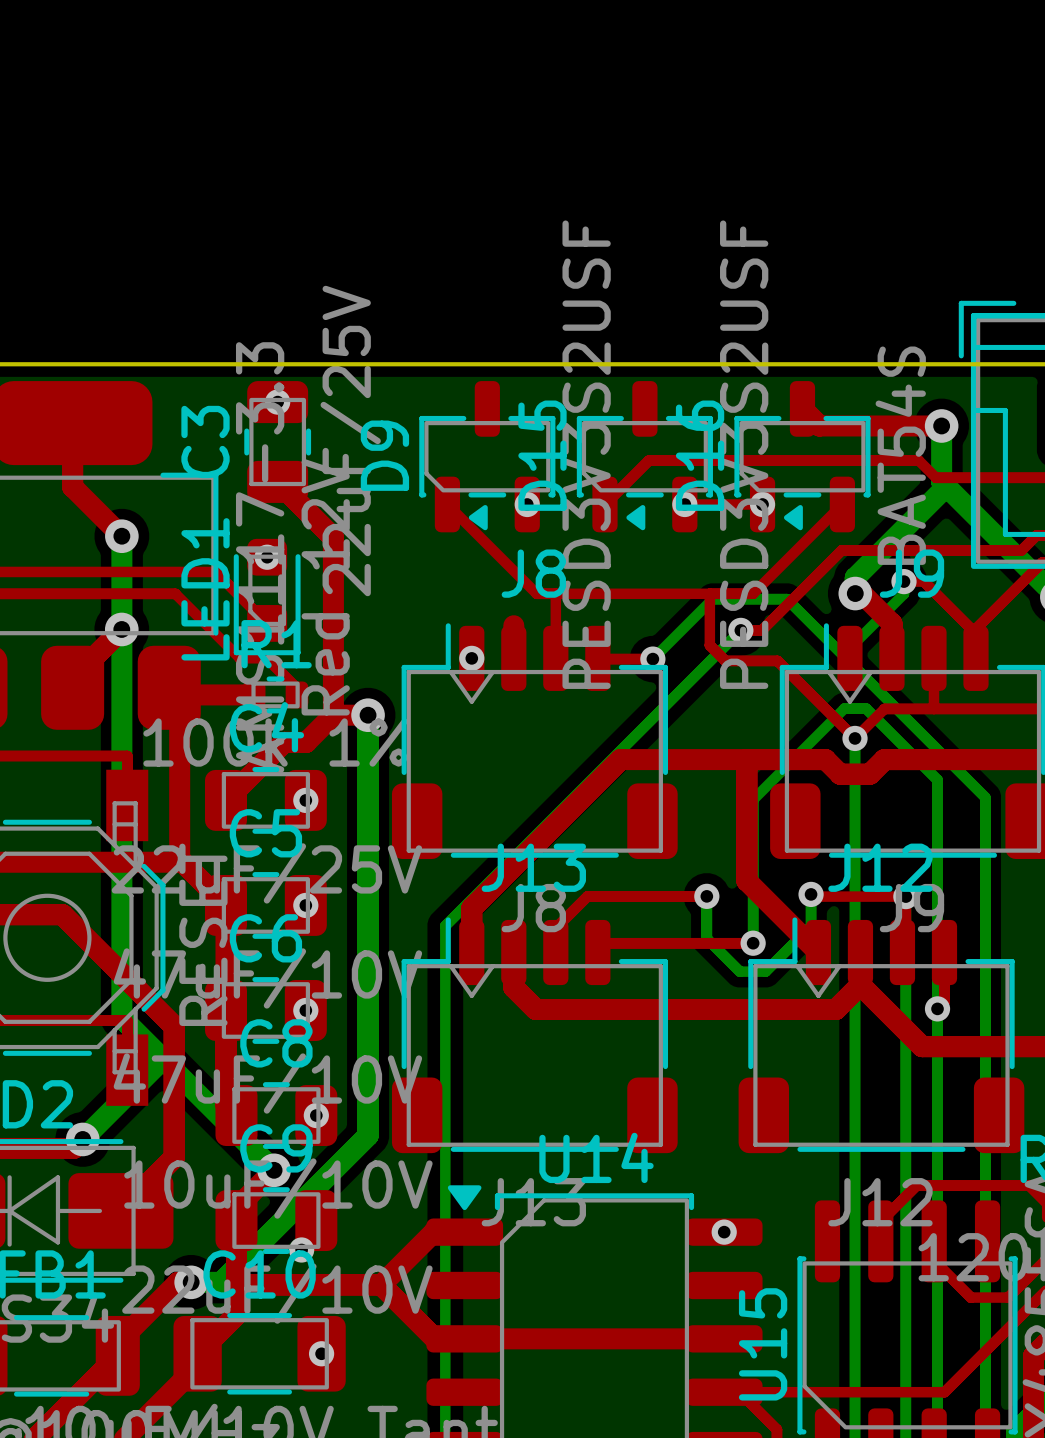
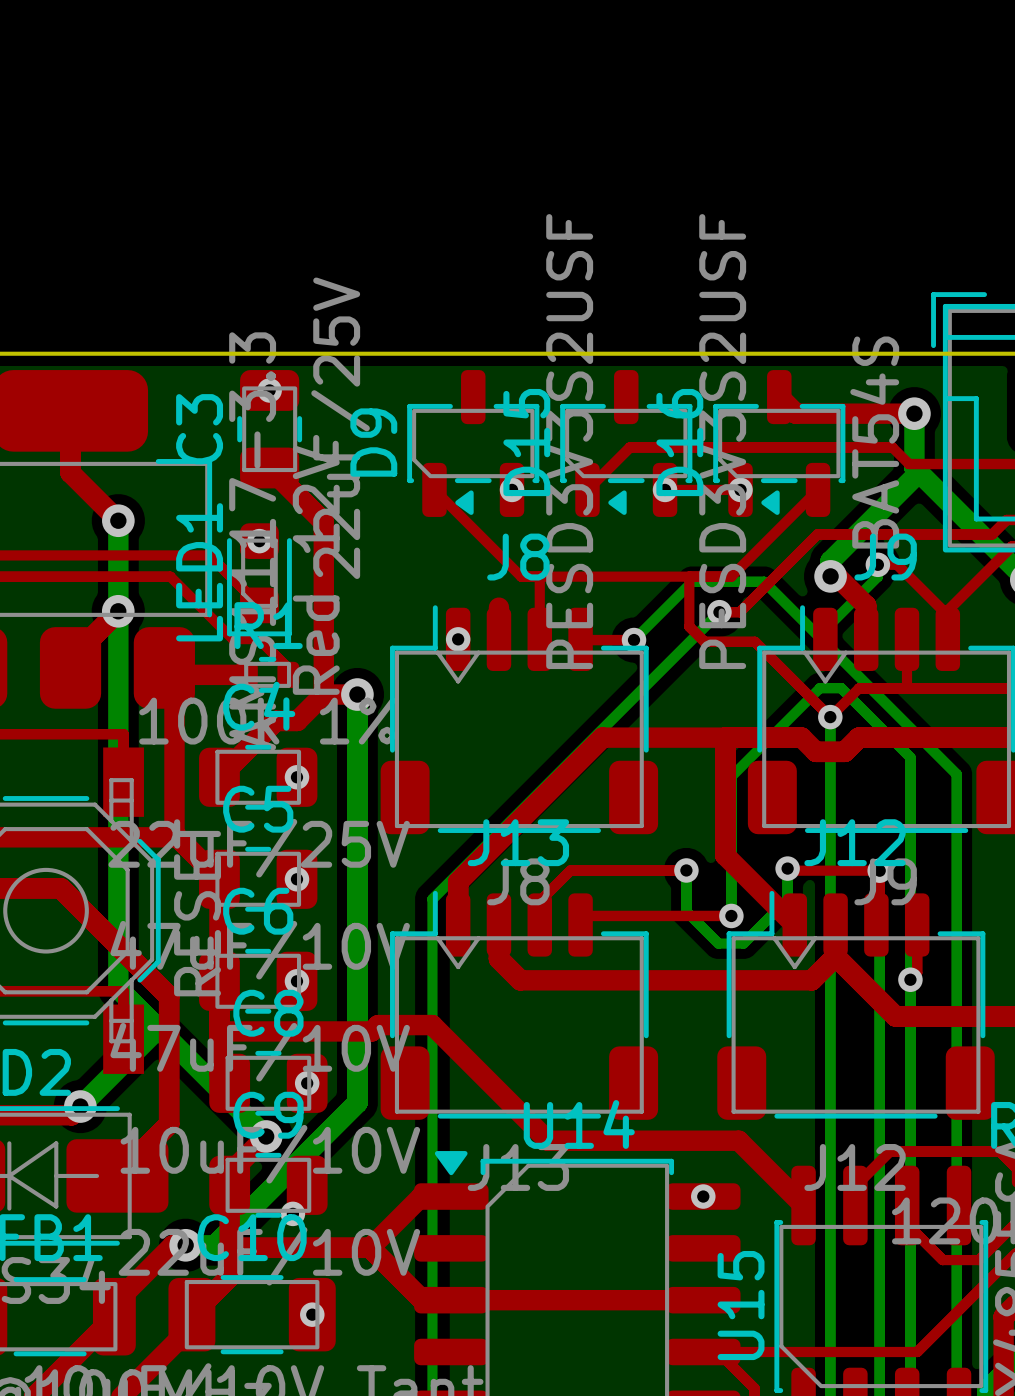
top track: none -> (219, 1031) (371, 1031) (378, 1025) (432, 1025) (547, 1140) (738, 1140) (803, 1205)

